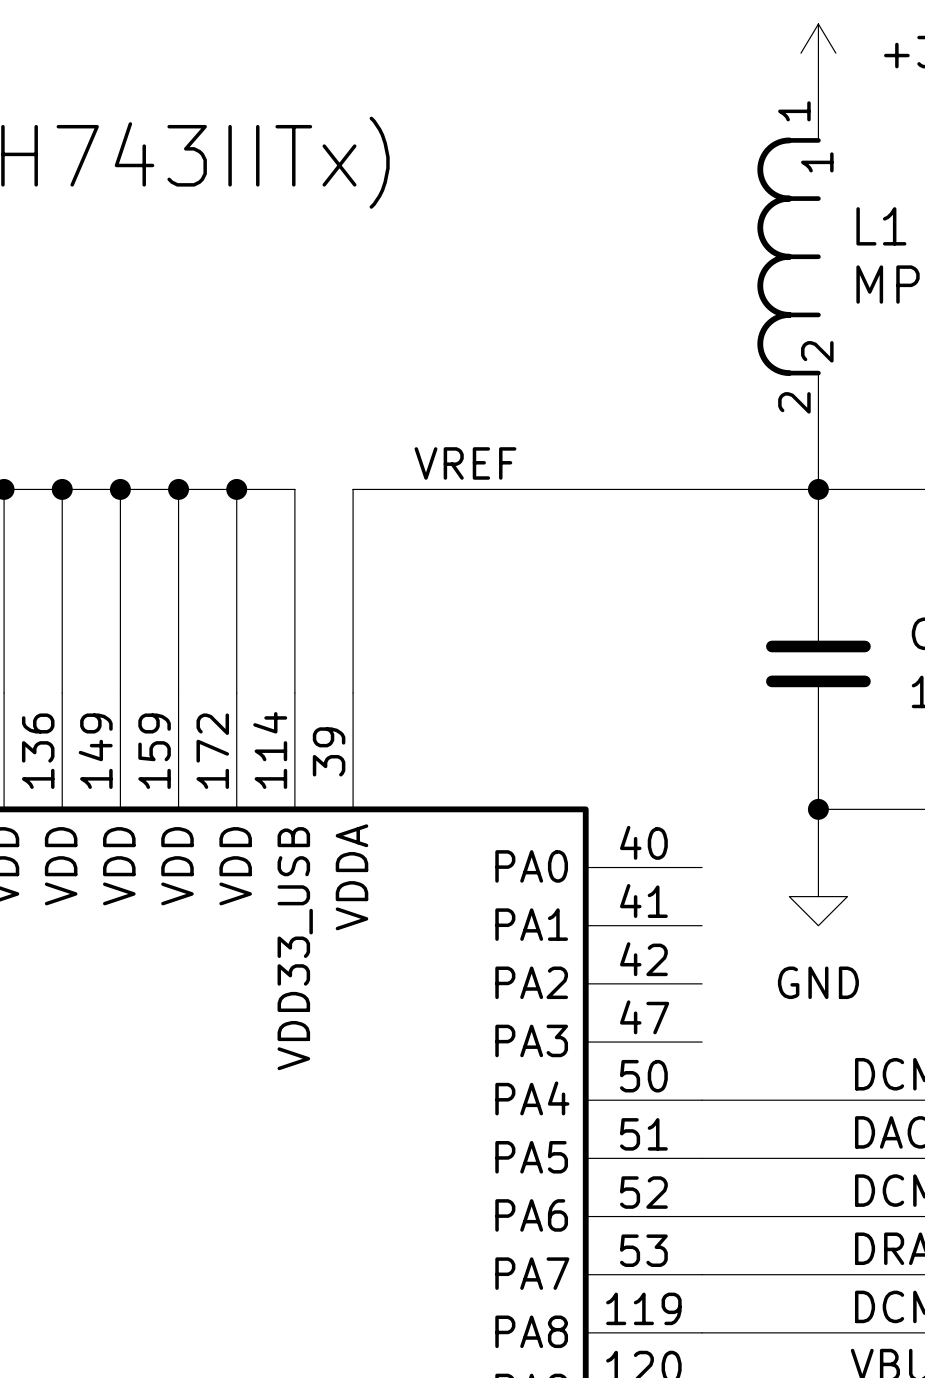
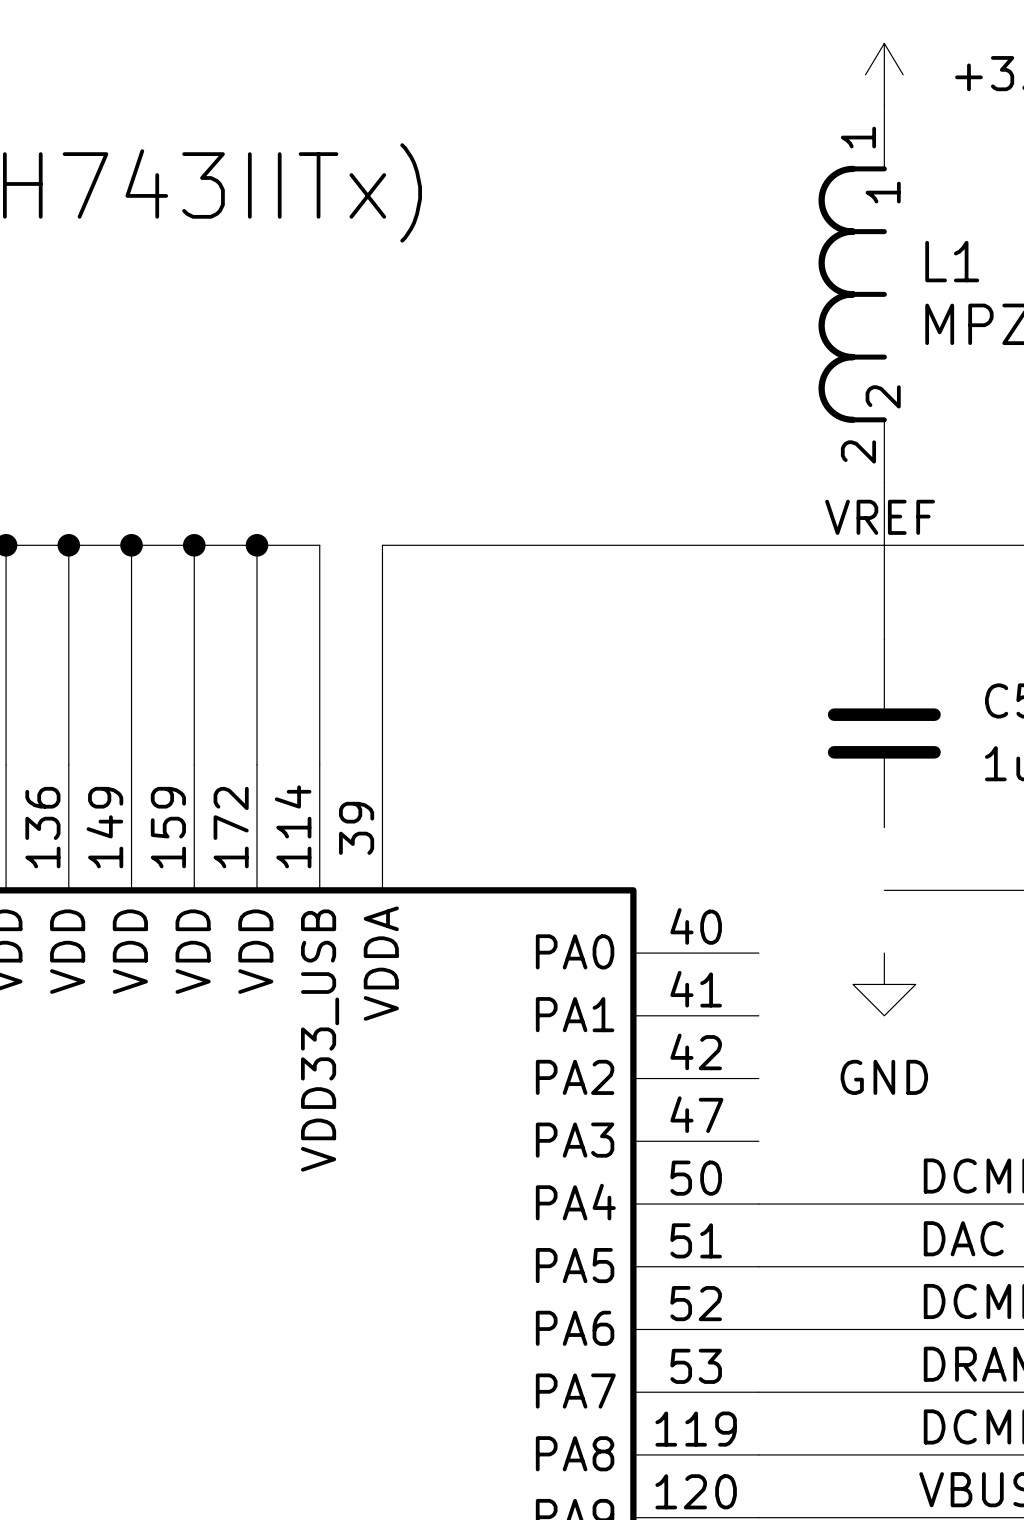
label position: VREF (465, 463) -> VREF (880, 517)
junction: (818, 489) -> none
wire: (818, 751) (818, 867) -> none
junction: (818, 809) -> none

